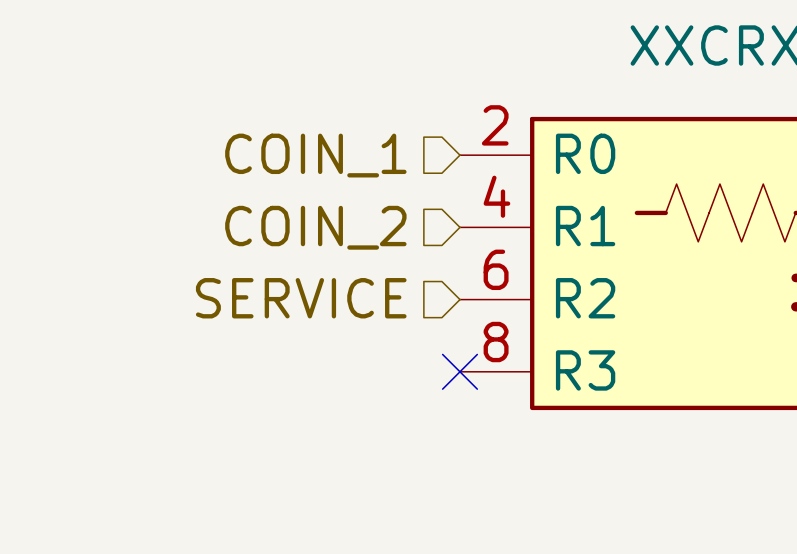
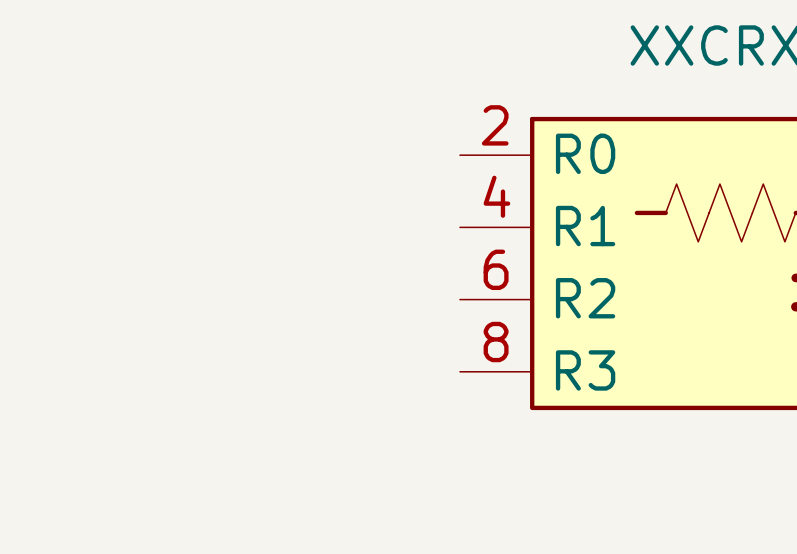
hierarchical label: COIN_1 (315, 155) -> none
hierarchical label: COIN_2 (315, 227) -> none
hierarchical label: SERVICE (301, 298) -> none
no-connect mark: (459, 371) -> none

